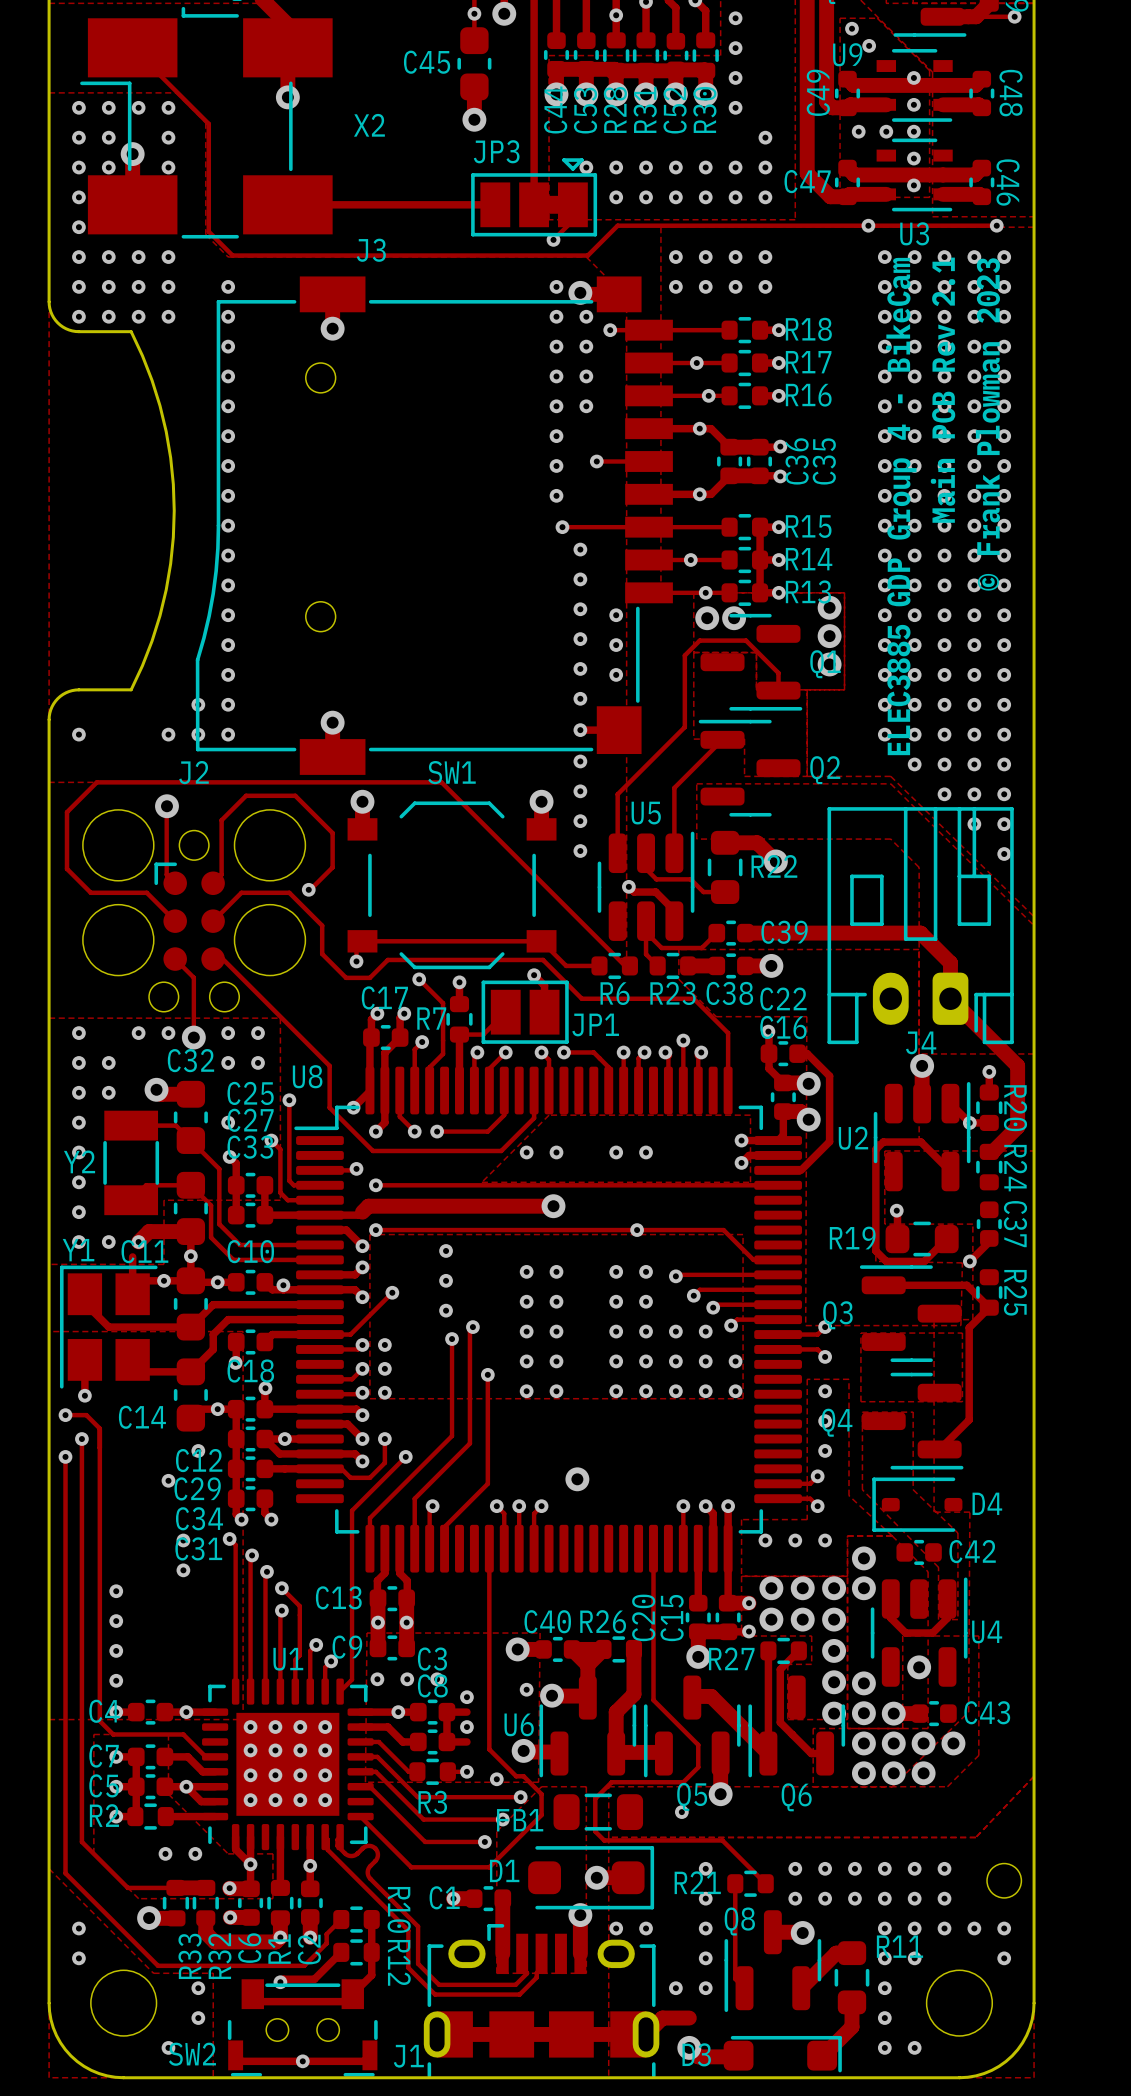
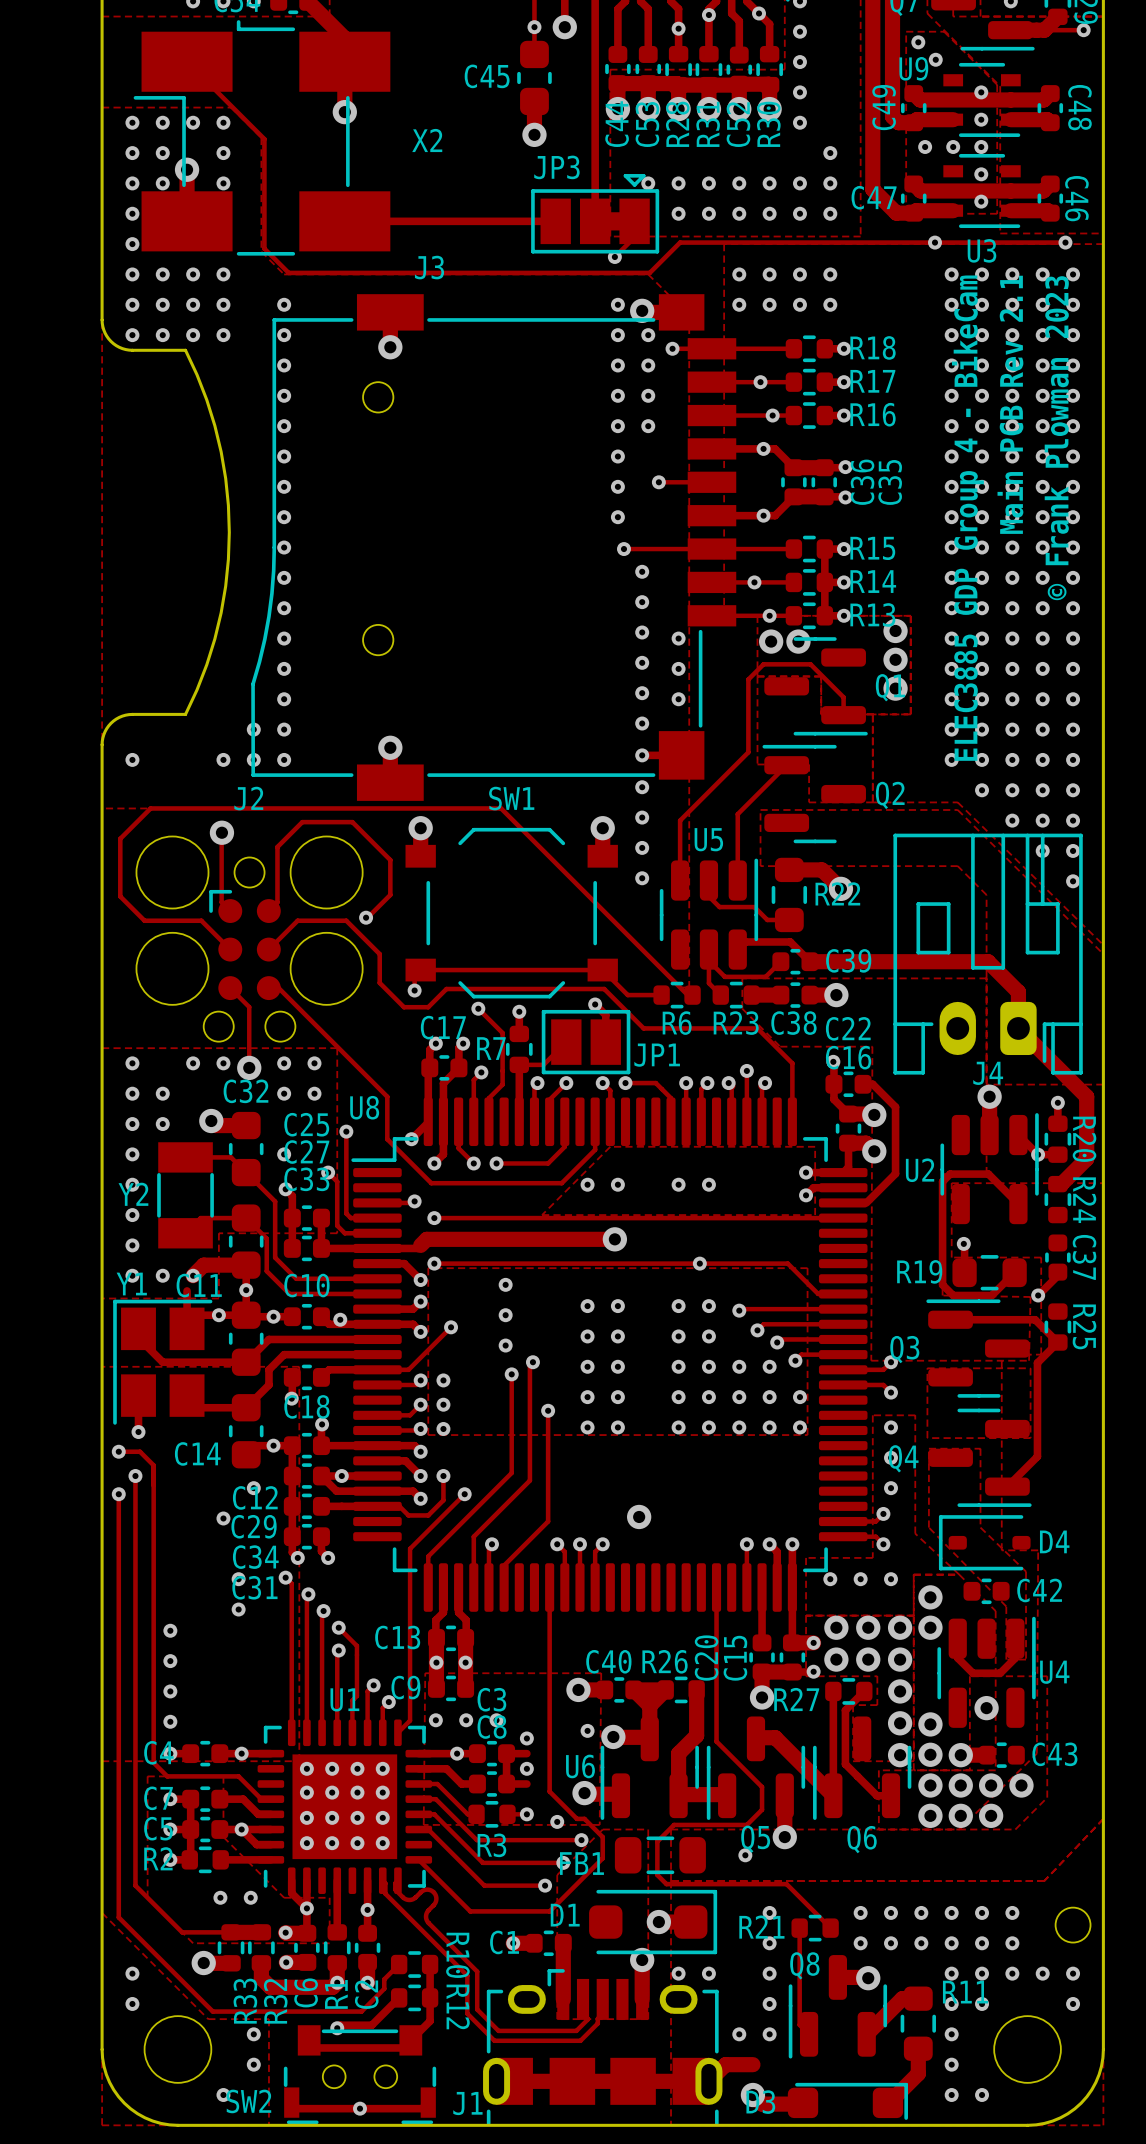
track: (628, 886) (634, 892) (655, 892) (674, 910) (674, 921) -> (809, 961) (790, 941) (745, 941) (737, 949)
via: (628, 886) -> none

